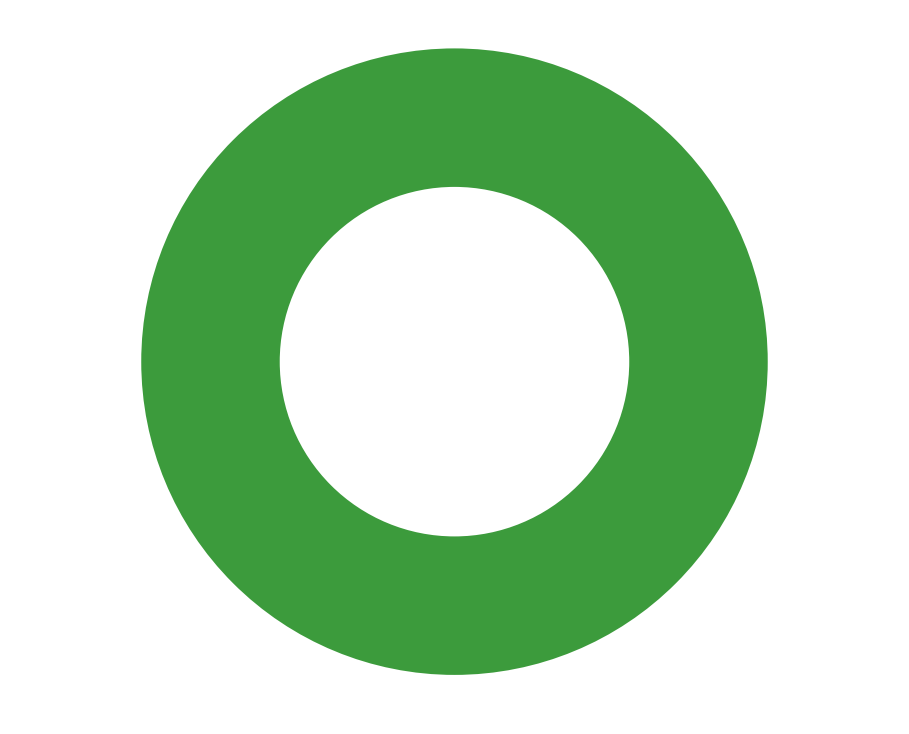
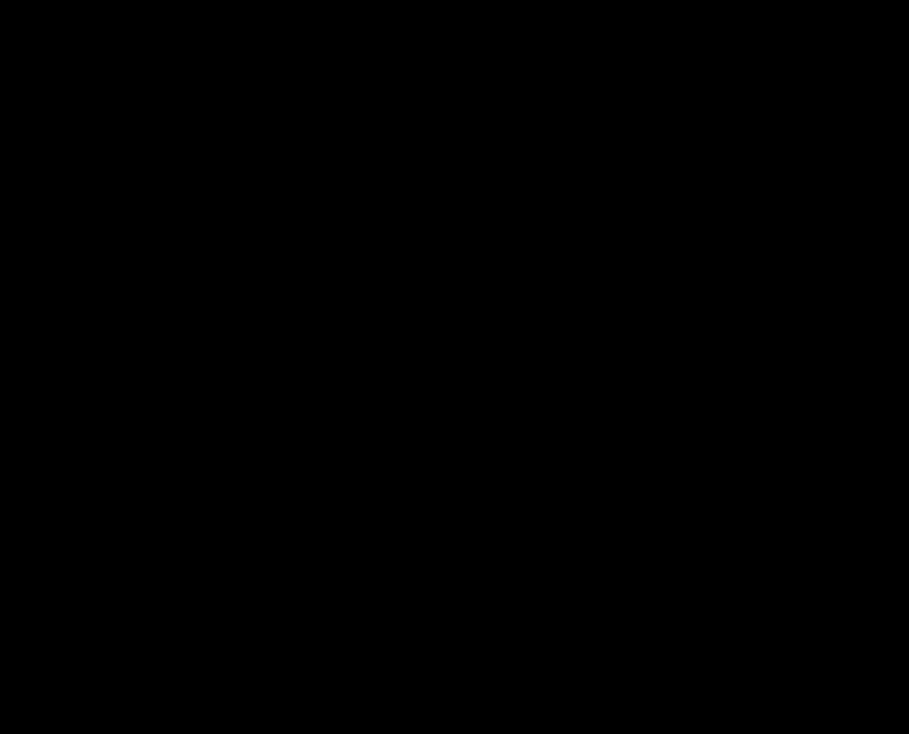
part: (454, 361) -> none

